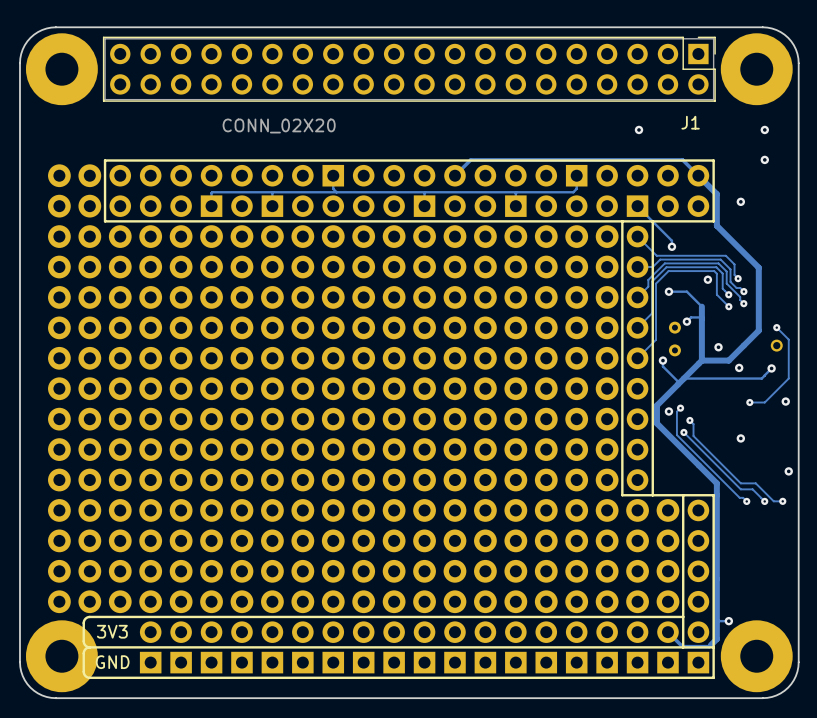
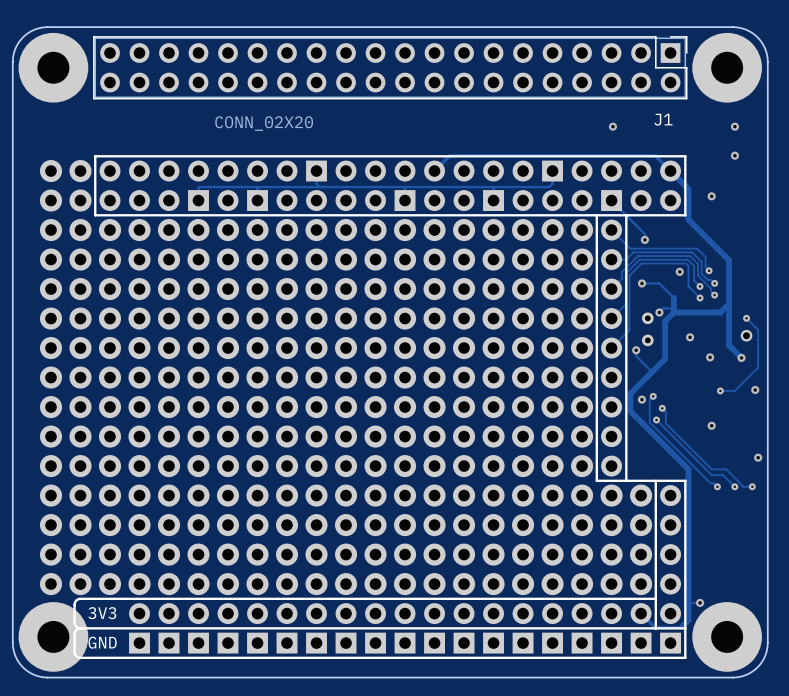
track: (701, 321) (701, 360) -> none
track: (758, 330) (728, 360) (701, 360) -> (729, 321) (729, 345) (741, 357)
track: (701, 360) (692, 369) -> (729, 303) (720, 312) (673, 312) (665, 321) (665, 358)
track: (771, 368) (761, 378) (683, 378) -> none

